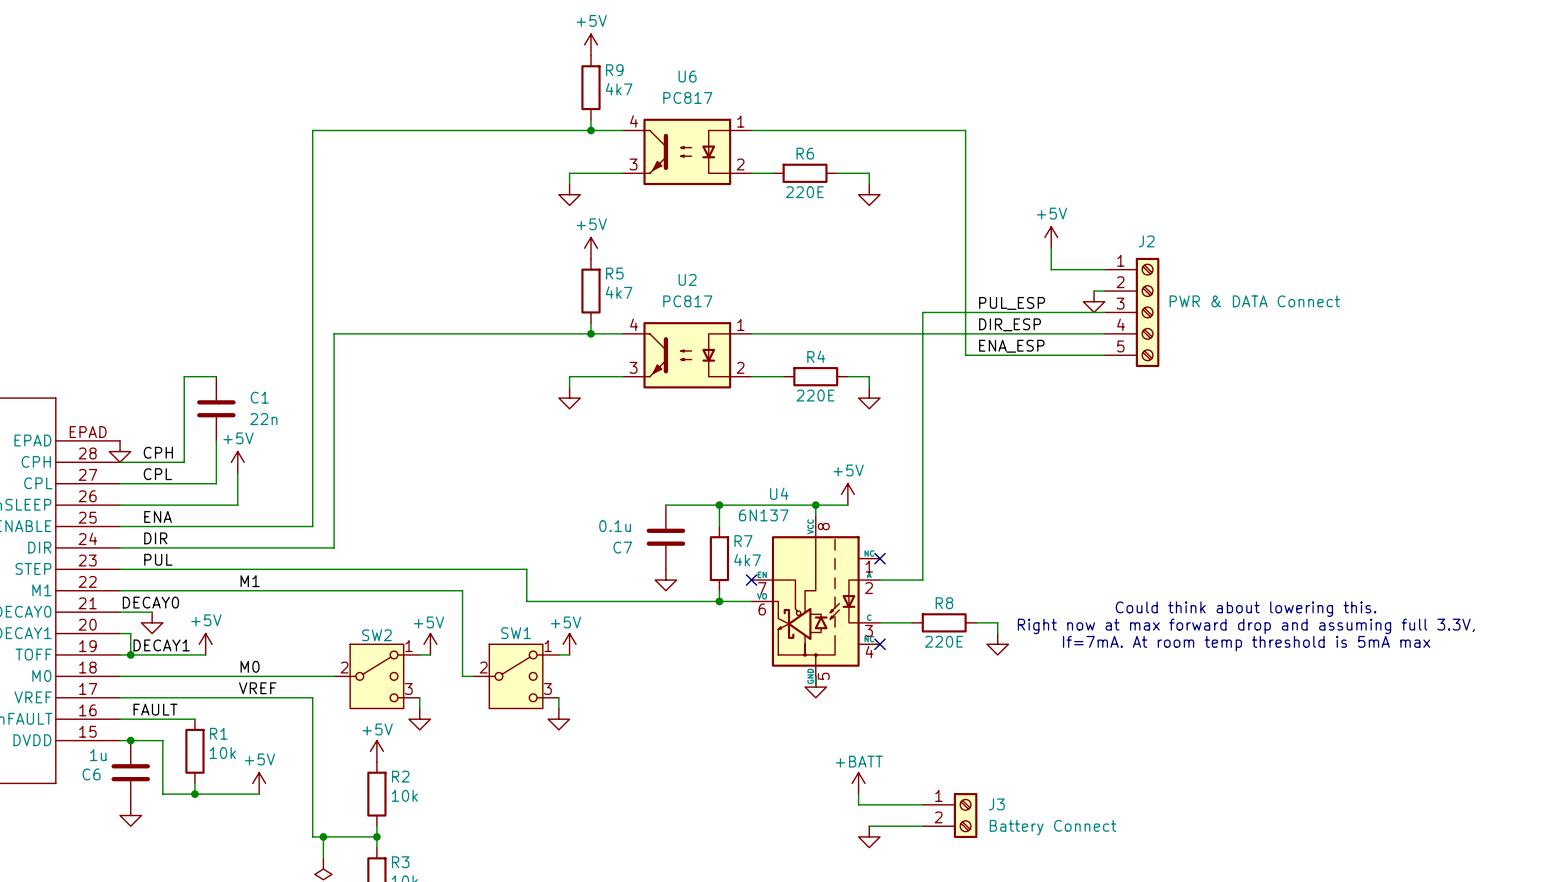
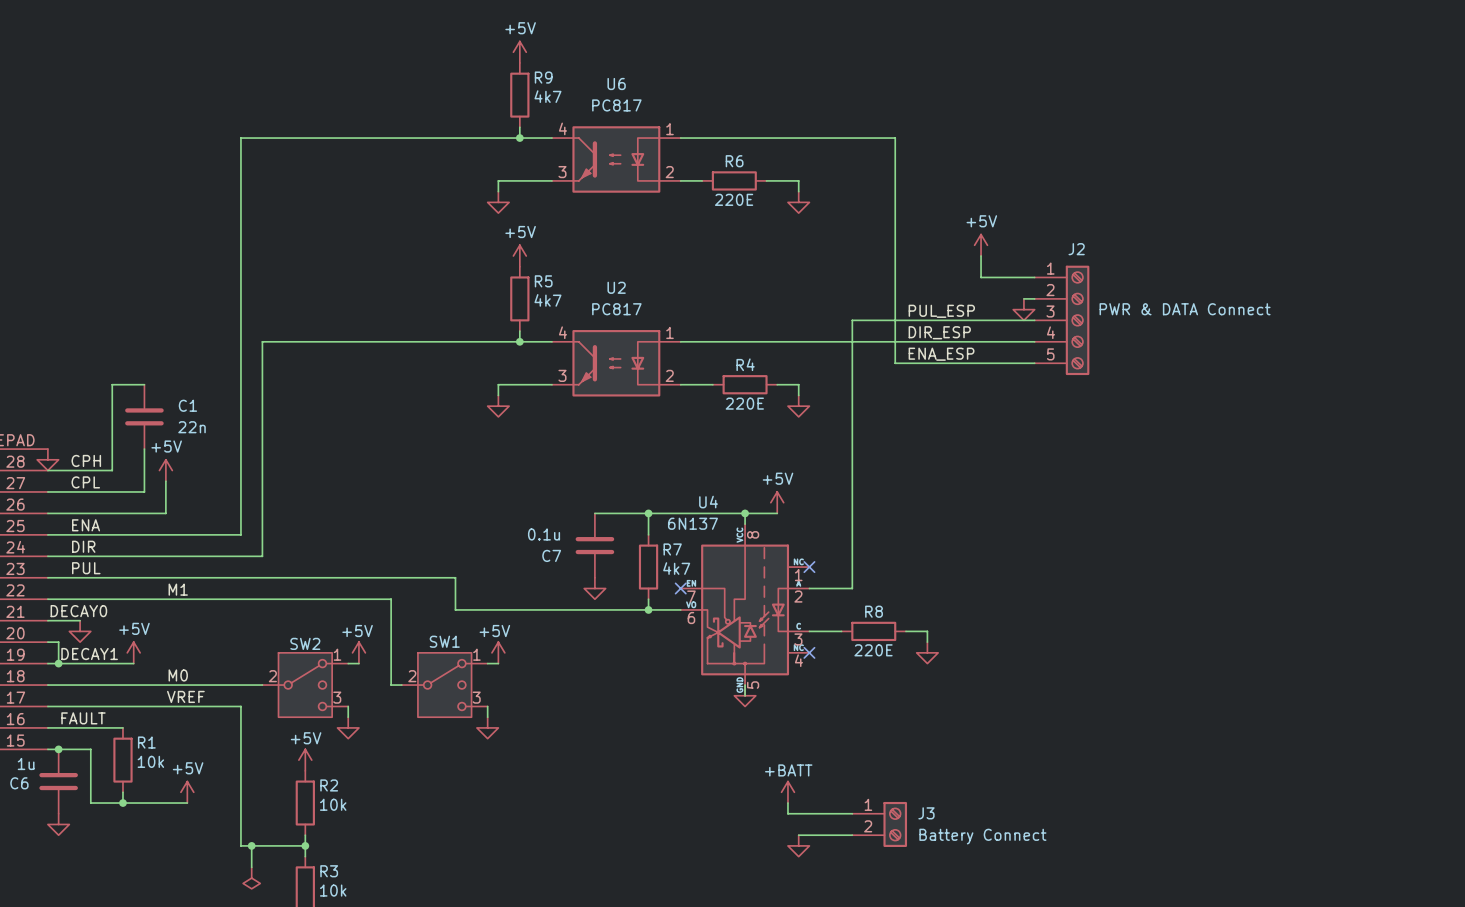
text: Could think about lowering this. (1246, 609) -> none
text: Right now at max forward drop and assuming full 3.3V, (1246, 626) -> none
text: If=7mA. At room temp threshold is 5mA max (1246, 643) -> none

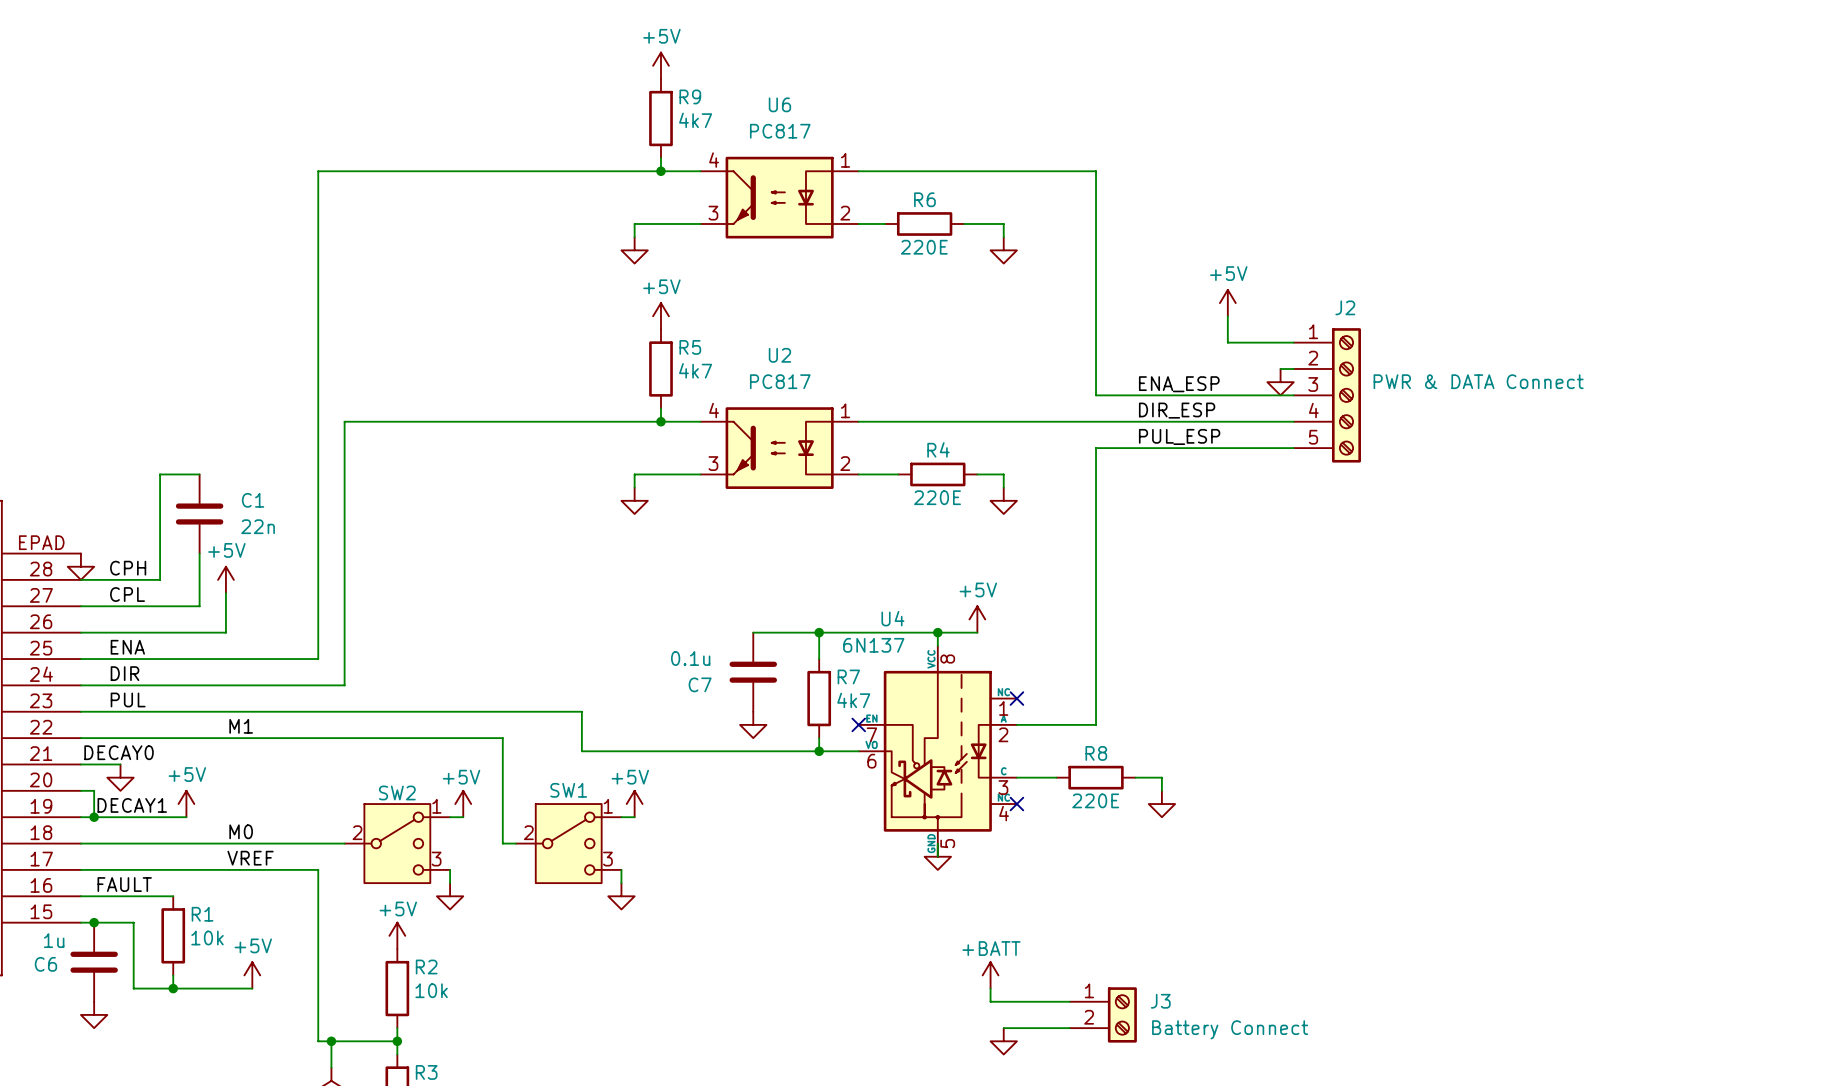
wire: (873, 138) (895, 138) (895, 363) -> (1096, 171) (1096, 395)
label: PUL_ESP (941, 311) -> ENA_ESP (1179, 384)
wire: (873, 320) (852, 320) (852, 588) -> (1122, 448) (1096, 448) (1096, 724) (1069, 724)
label: ENA_ESP (941, 354) -> PUL_ESP (1179, 436)

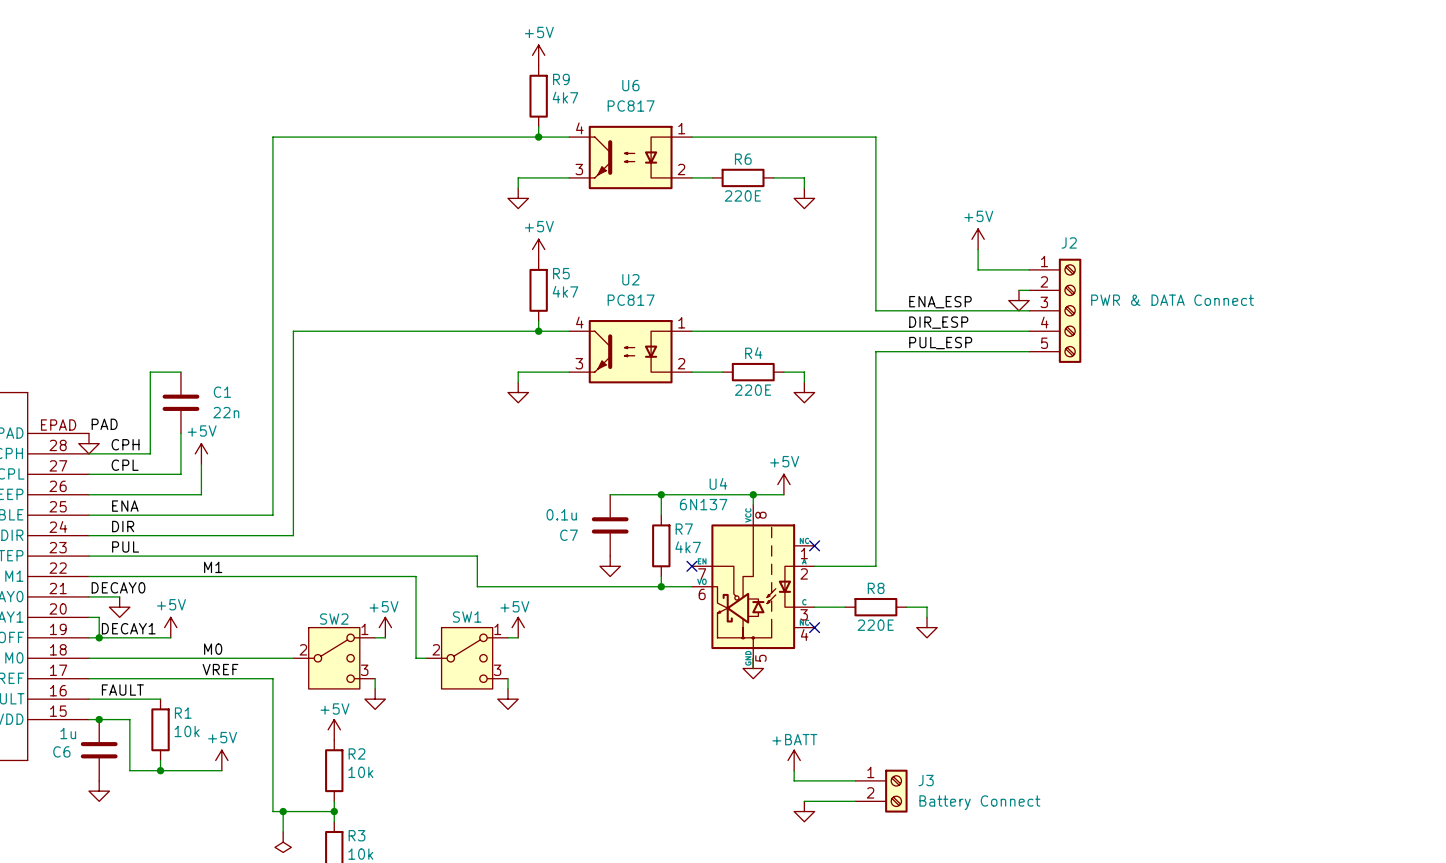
label: none -> PAD (104, 424)

